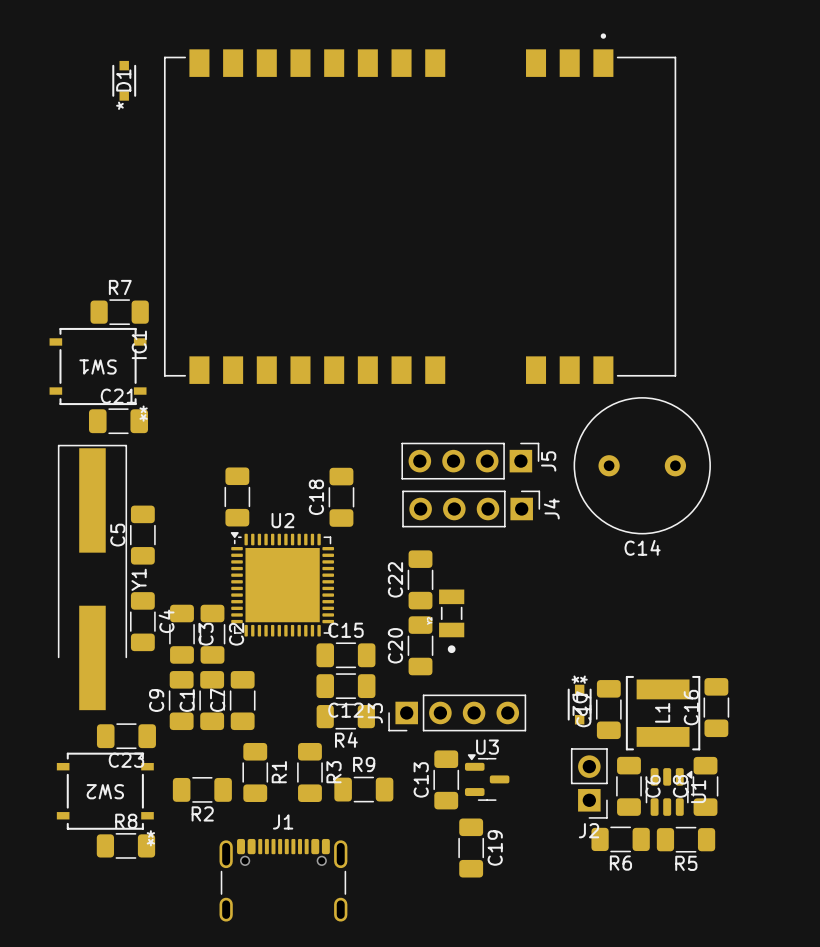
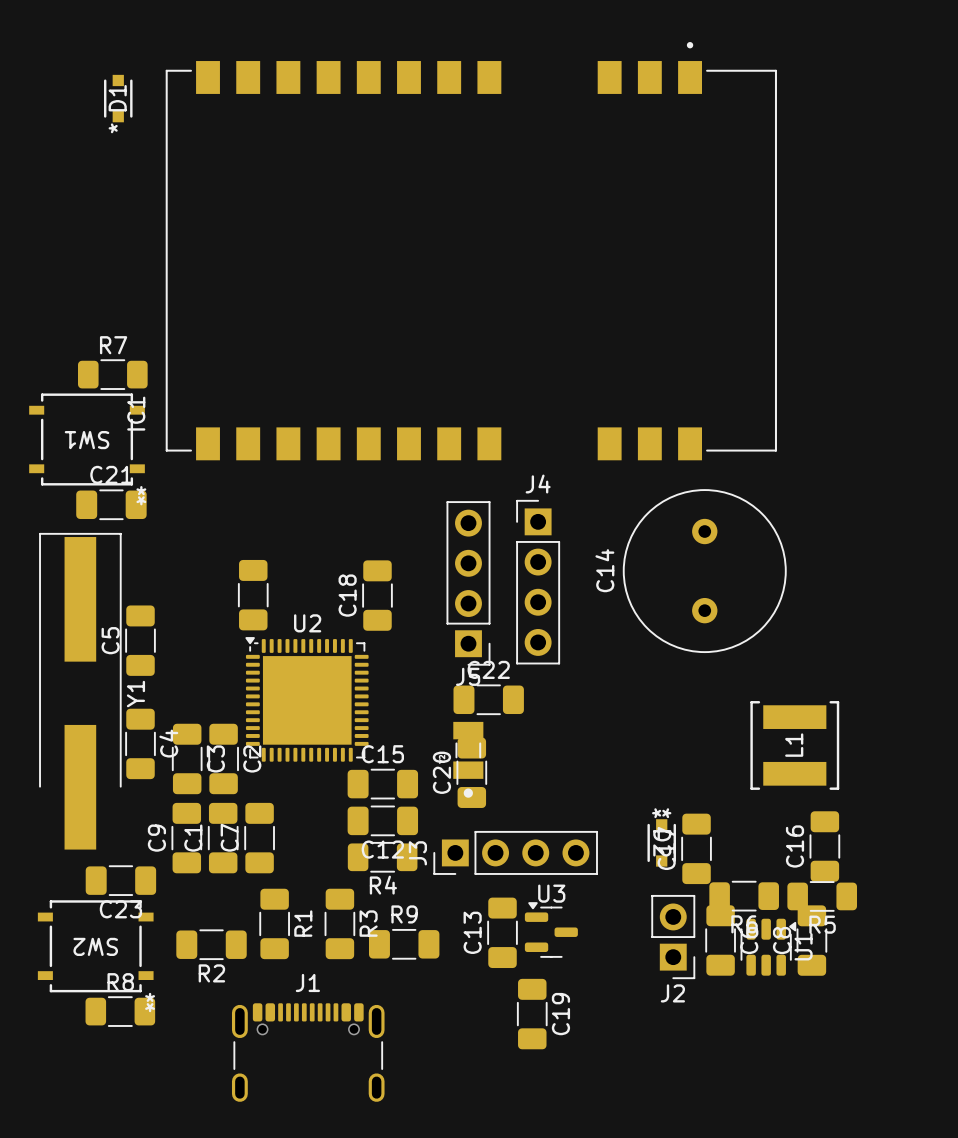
J5 rotation: 0° (470, 461) -> 90° clockwise (468, 583)
C14 rotation: 0° (642, 465) -> 90° clockwise (704, 571)
J4 rotation: 0° (471, 509) -> 90° counterclockwise (538, 582)
C22 rotation: 0° (420, 579) -> 90° clockwise (488, 699)
part position: (451, 621) -> (468, 759)
L1 position: (663, 713) -> (794, 745)
R6 position: (620, 839) -> (744, 896)
R5 position: (686, 839) -> (822, 896)

